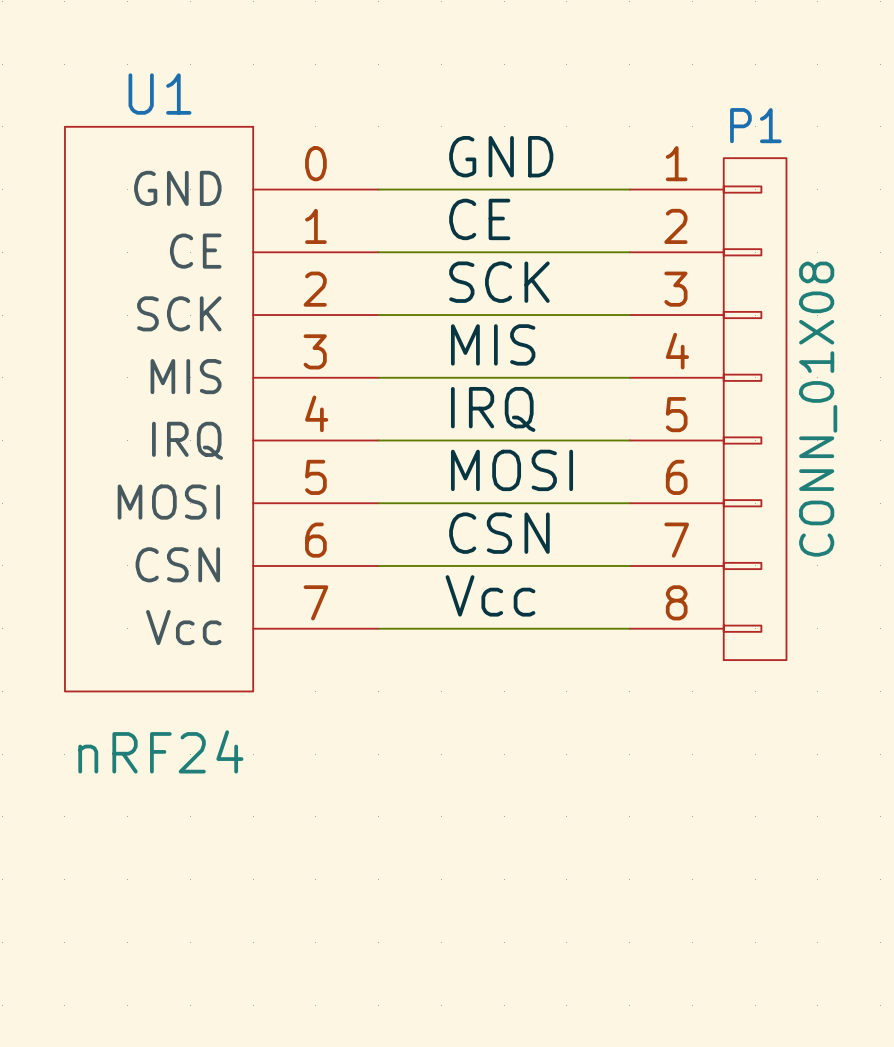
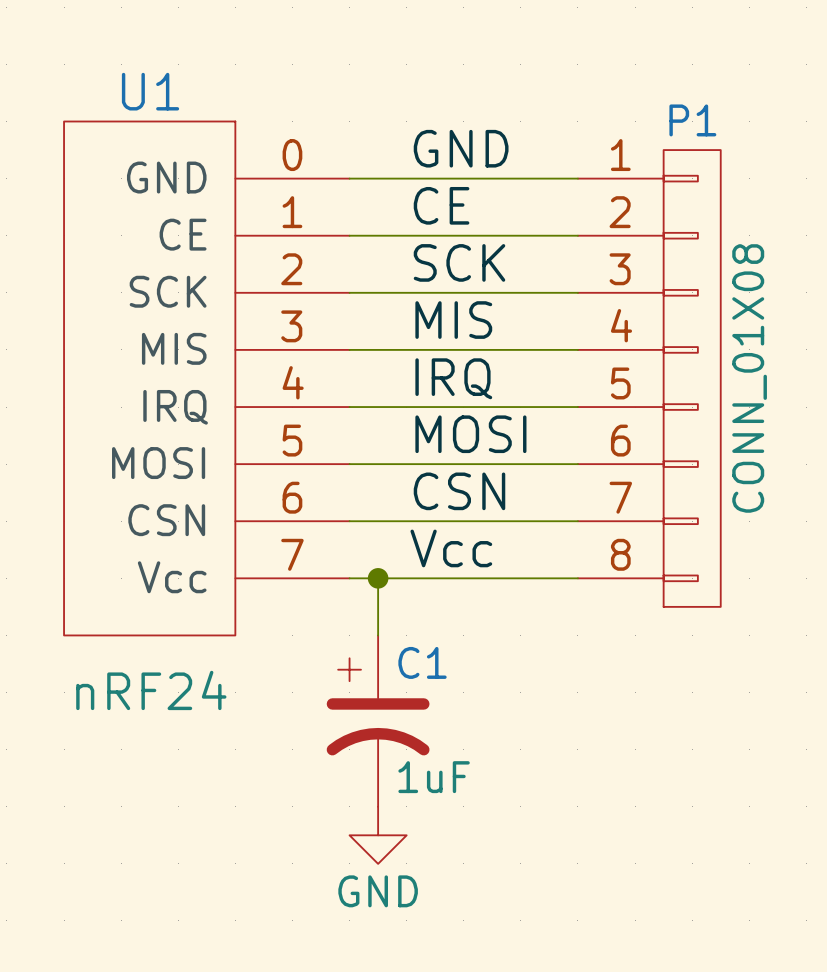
wire: none -> (378, 578) (378, 635)
junction: none -> (378, 578)
C1: none -> 1uF (378, 721)
power symbol: none -> GND (378, 835)

